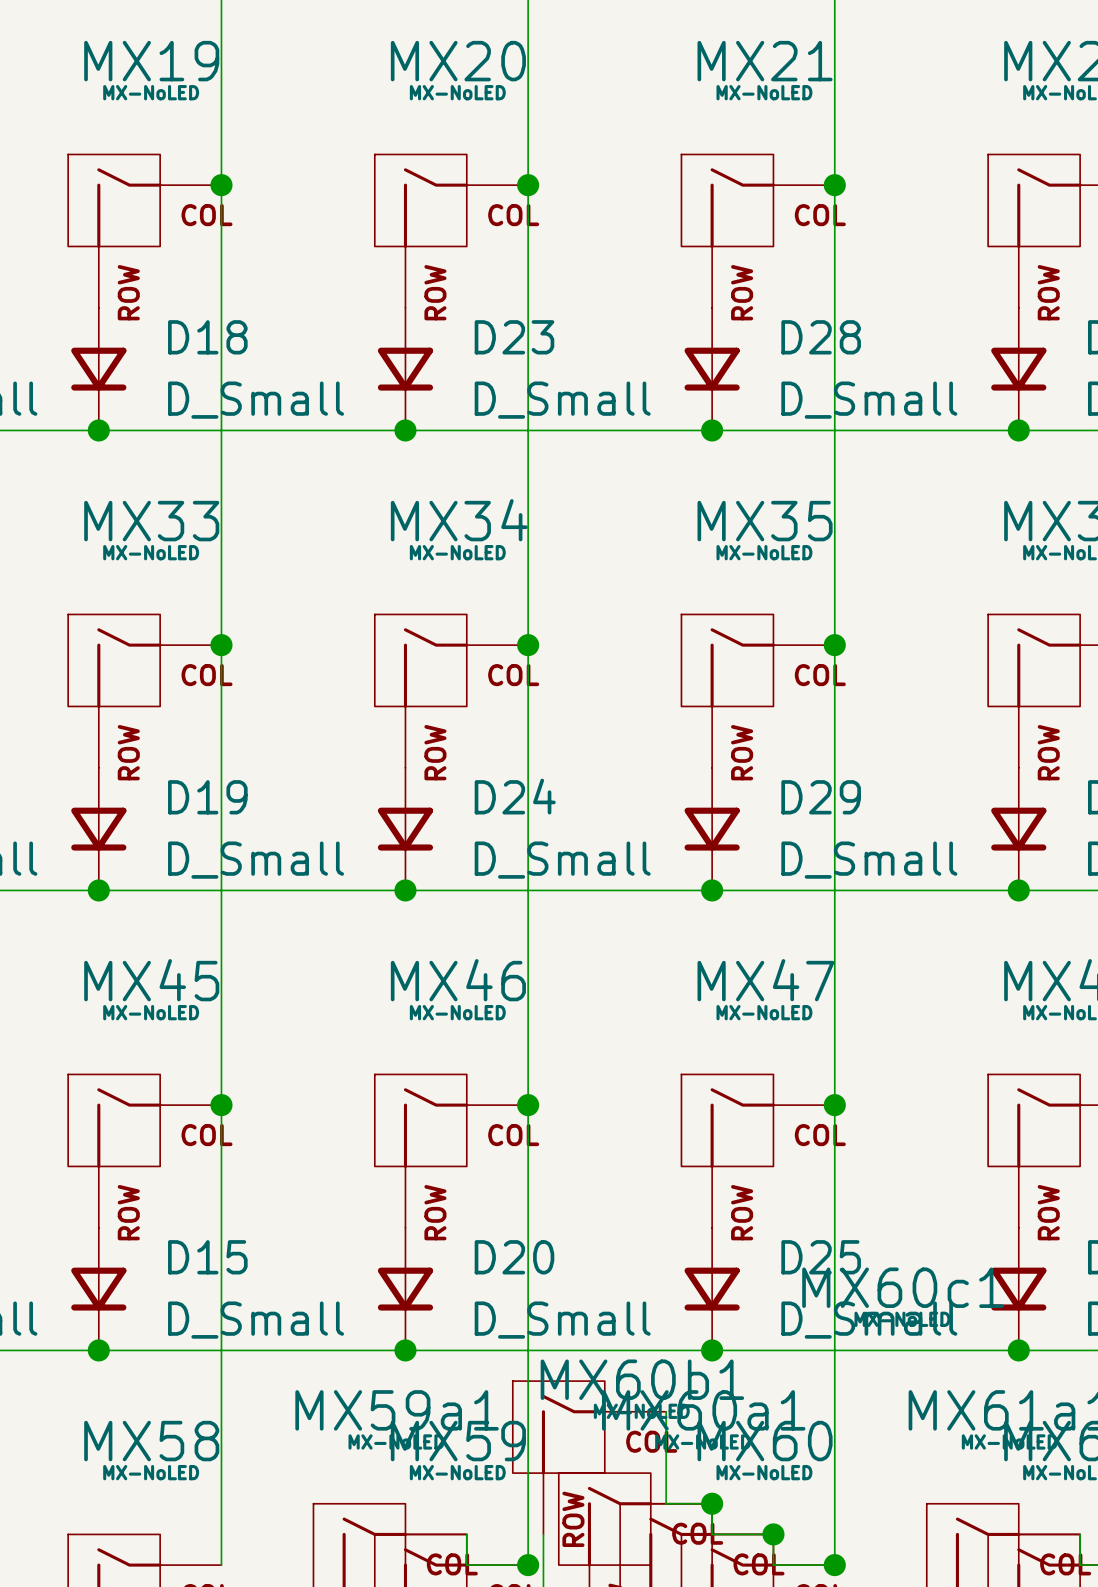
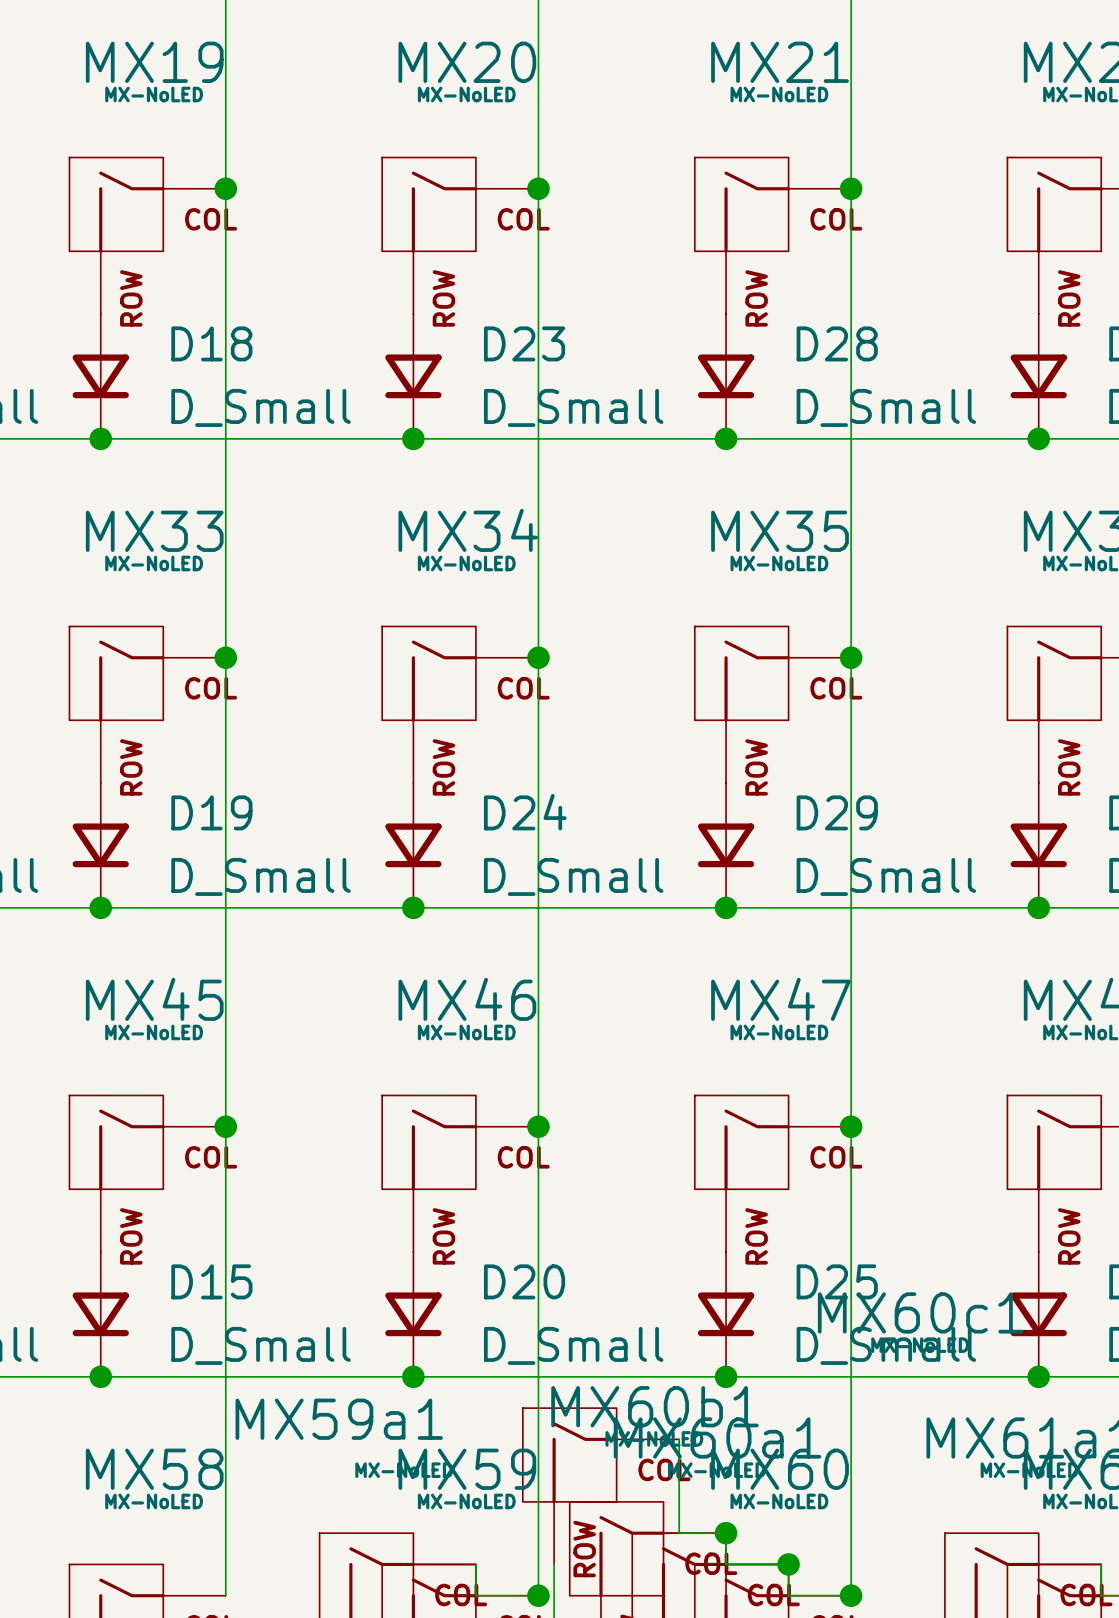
MX59a1 name position: MX59a1 (397, 1410) -> MX59a1 (339, 1419)

